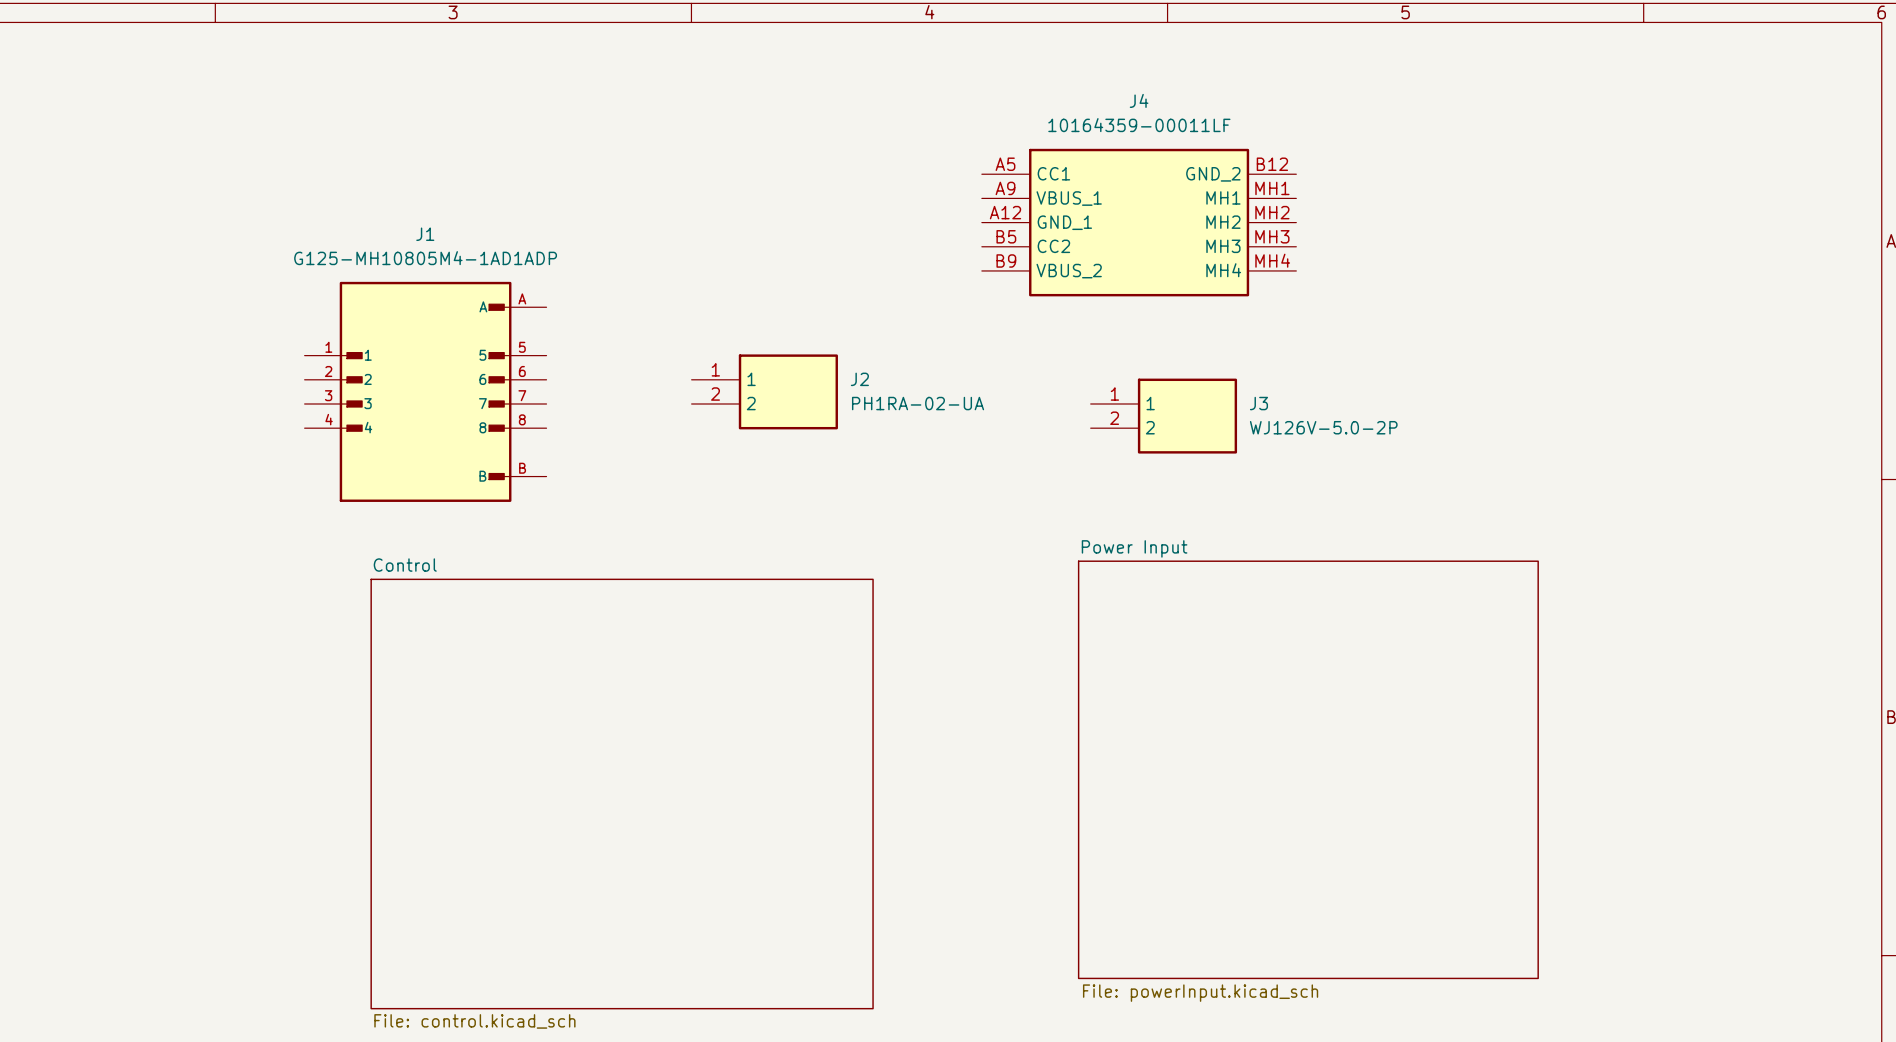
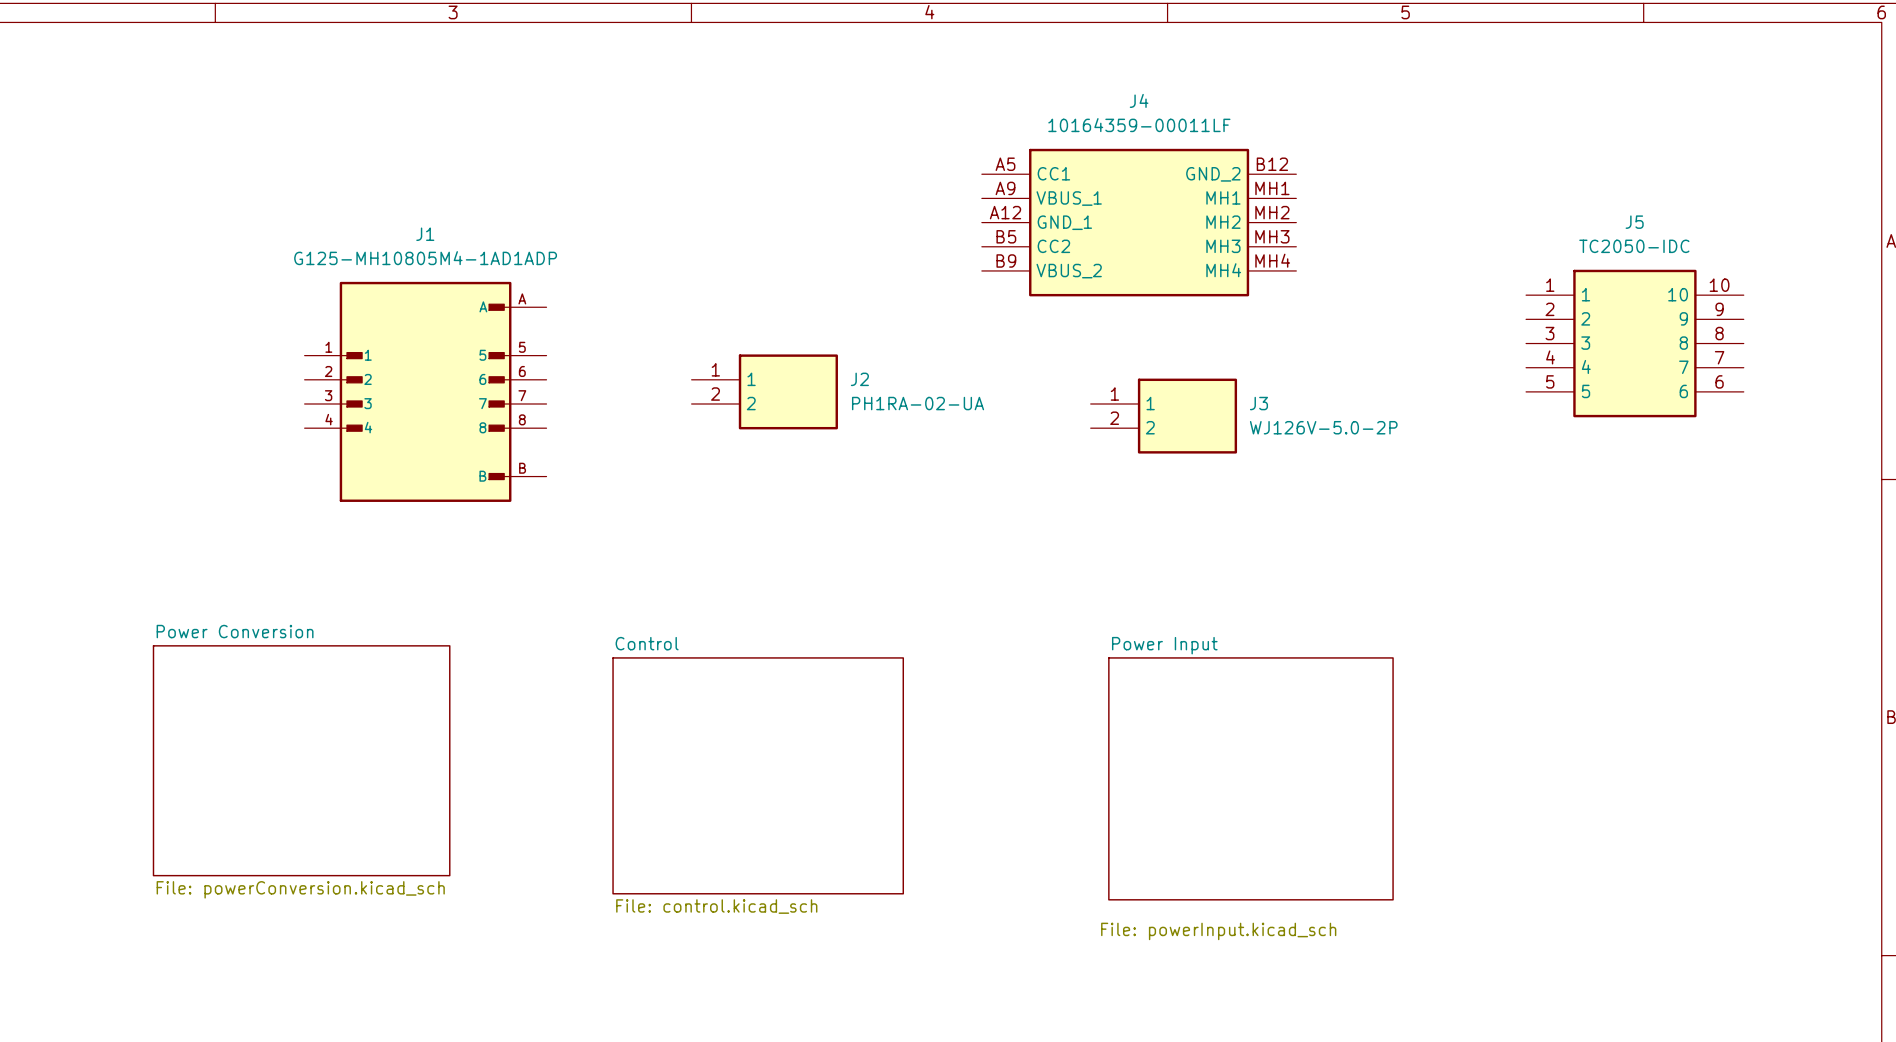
J5: none -> TC2050-IDC (1634, 343)
sheet Power Conversion: none -> File: powerConversion.kicad_sch (301, 760)
sheet Power Input: File: powerInput.kicad_sch (1308, 769) -> none
sheet Control: none -> File: control.kicad_sch (758, 775)
sheet Power Input: none -> File: powerInput.kicad_sch (1250, 778)
sheet Control: File: control.kicad_sch (622, 794) -> none

